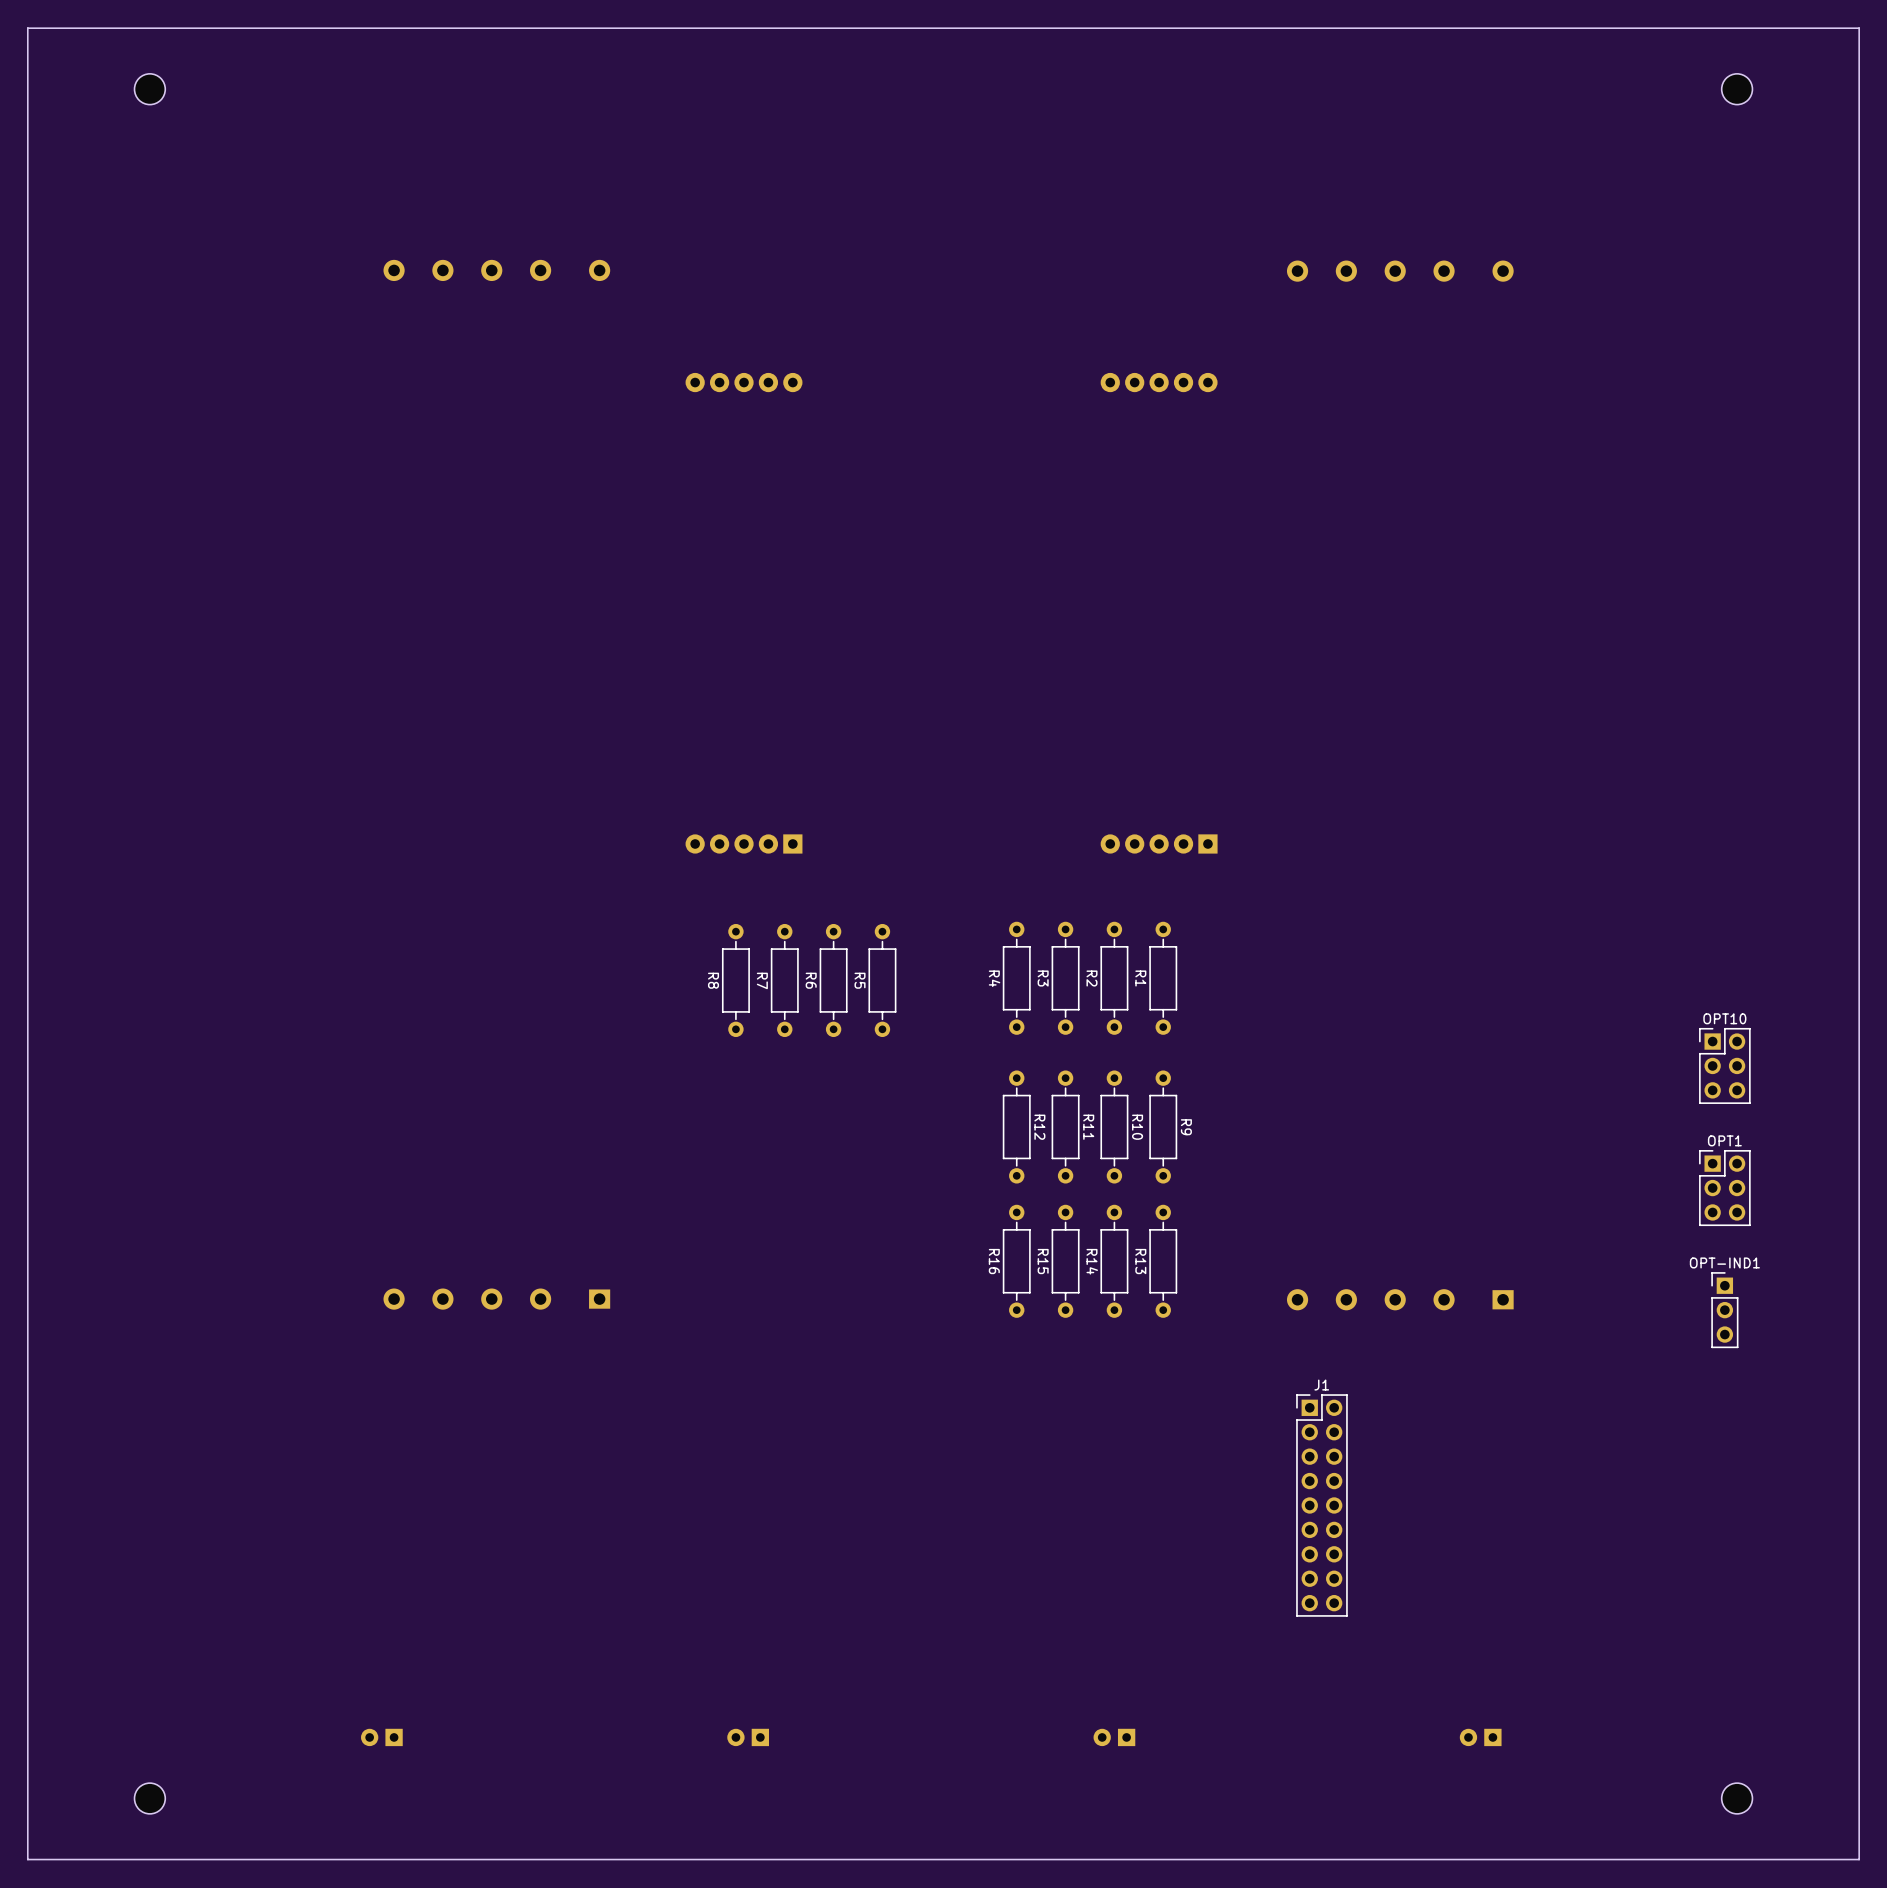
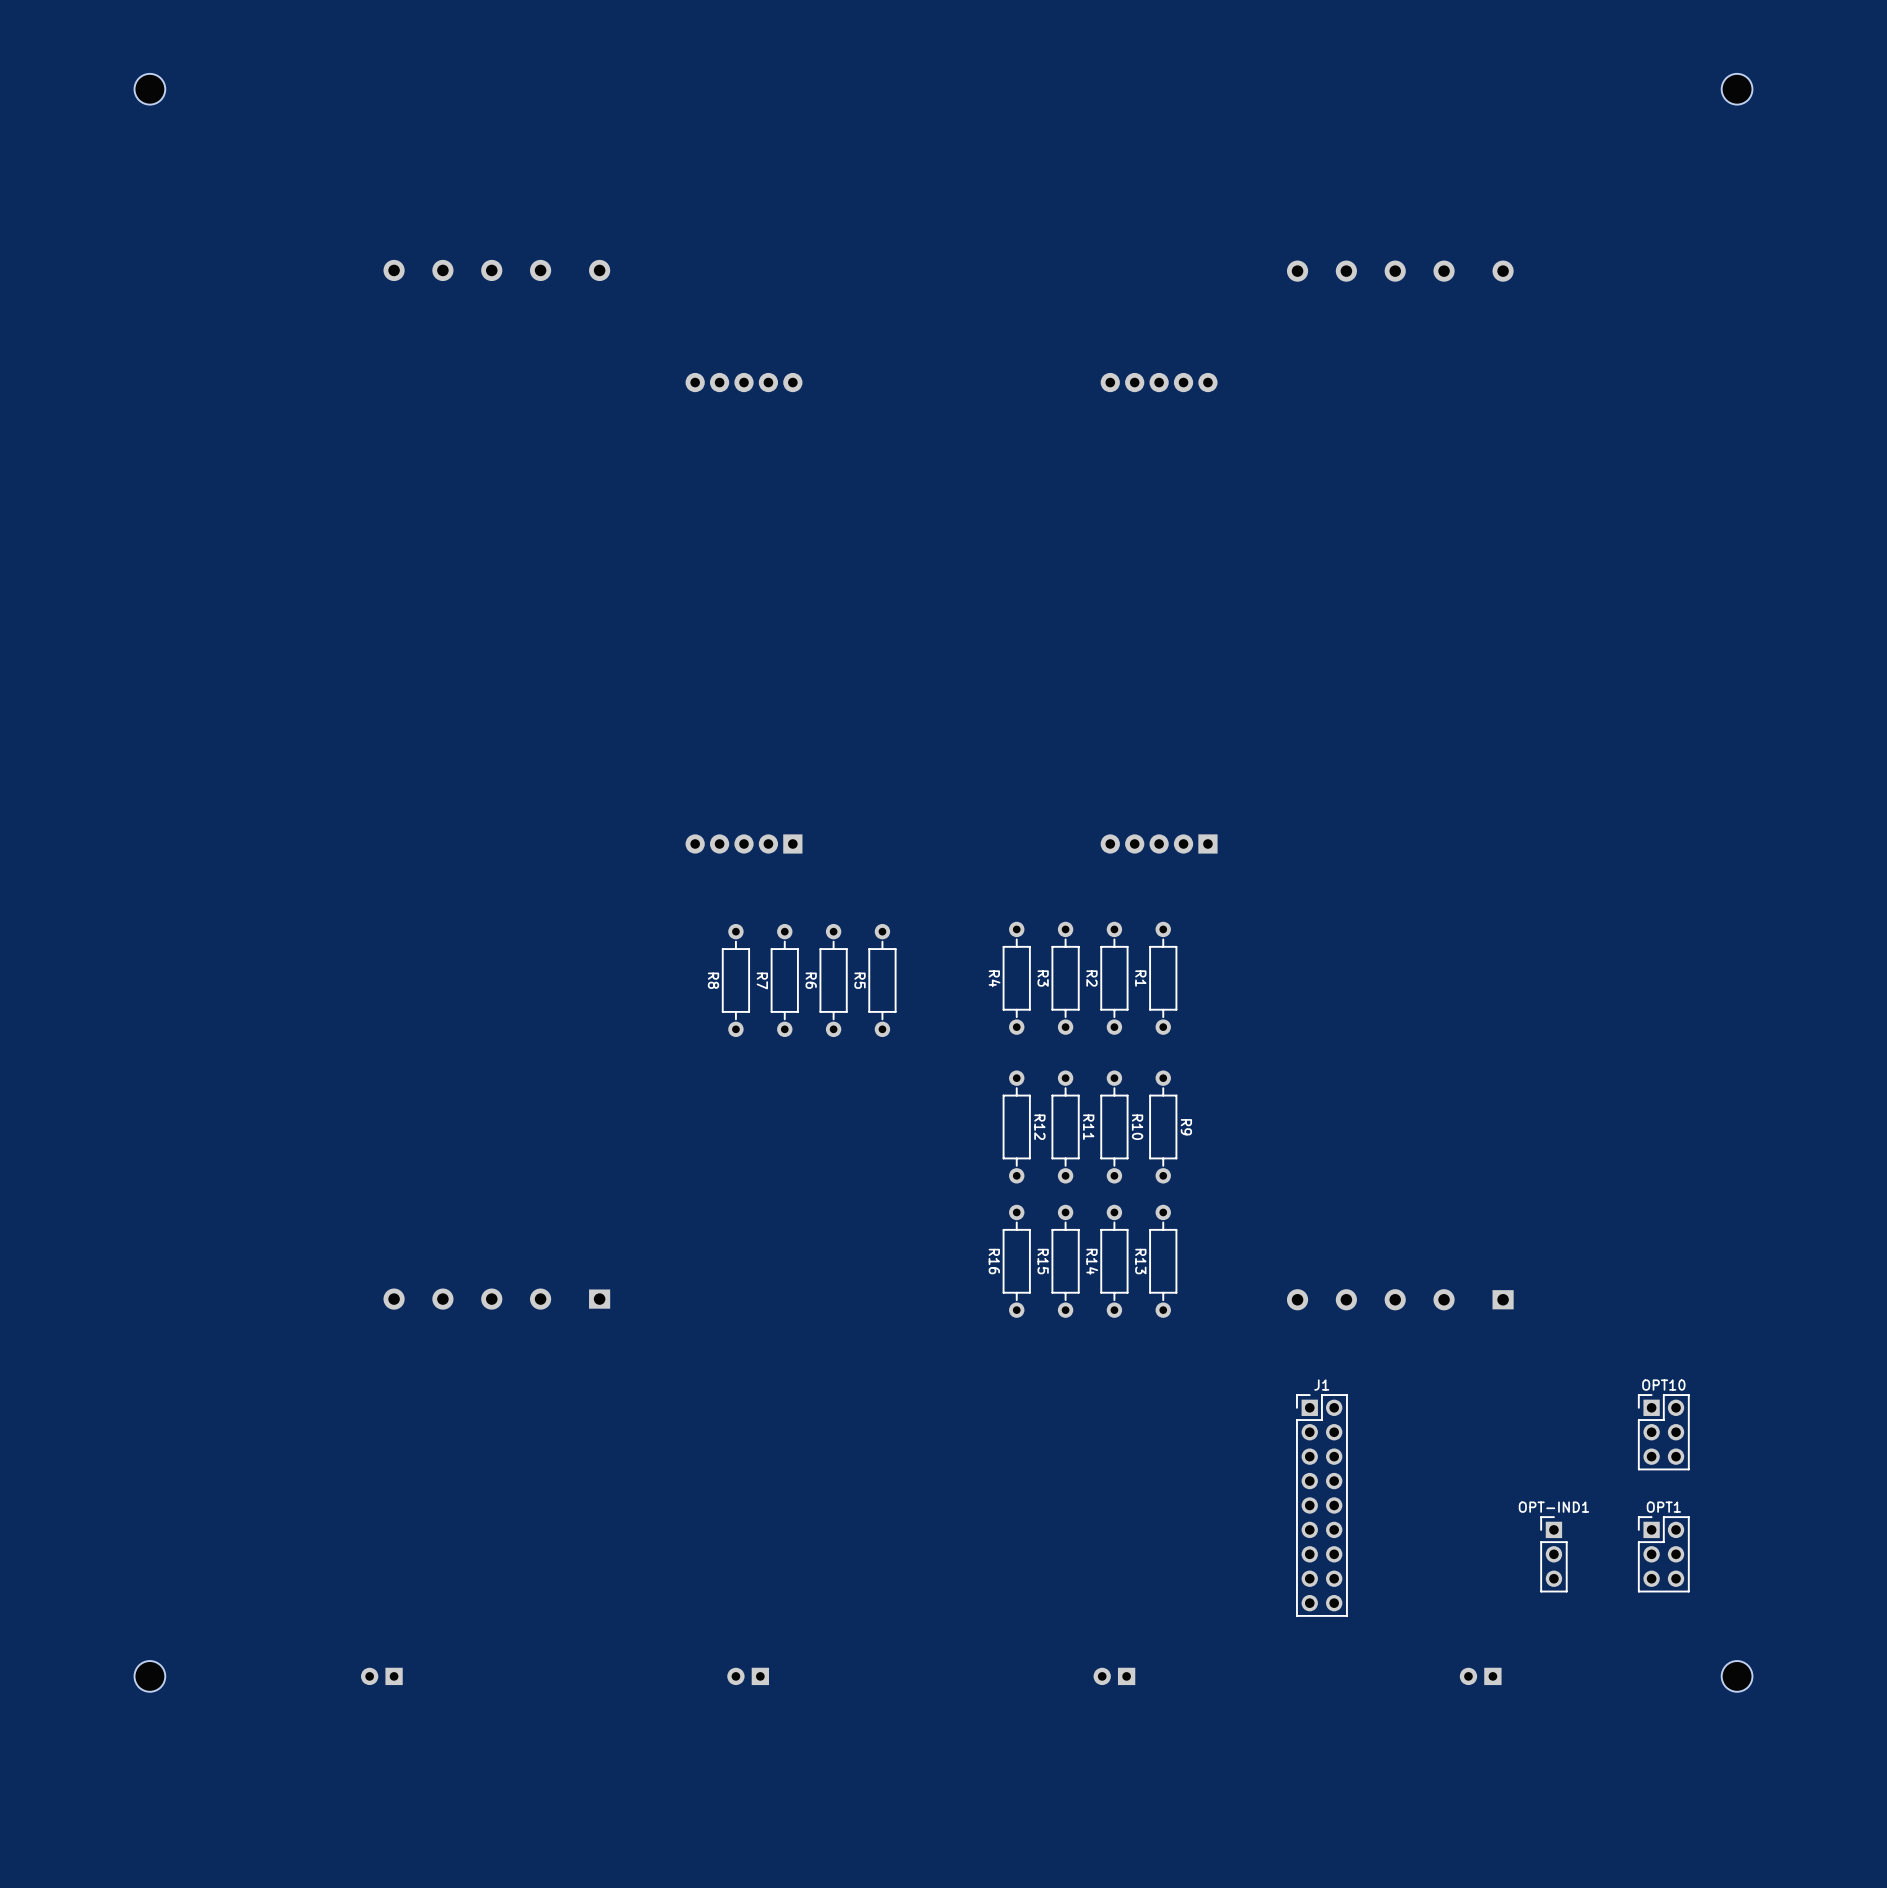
board edge: (1859, 28) (27, 28) (27, 1859) (1859, 1859) (1859, 28) -> none
OPT10 position: (1724, 1065) -> (1663, 1432)
OPT1 position: (1724, 1188) -> (1663, 1554)
OPT-IND1 position: (1724, 1310) -> (1553, 1554)
part position: (381, 1737) -> (381, 1676)
part position: (748, 1737) -> (748, 1676)
part position: (1114, 1737) -> (1114, 1676)
part position: (1480, 1737) -> (1480, 1676)
part position: (149, 1798) -> (149, 1676)
part position: (1737, 1798) -> (1737, 1676)

